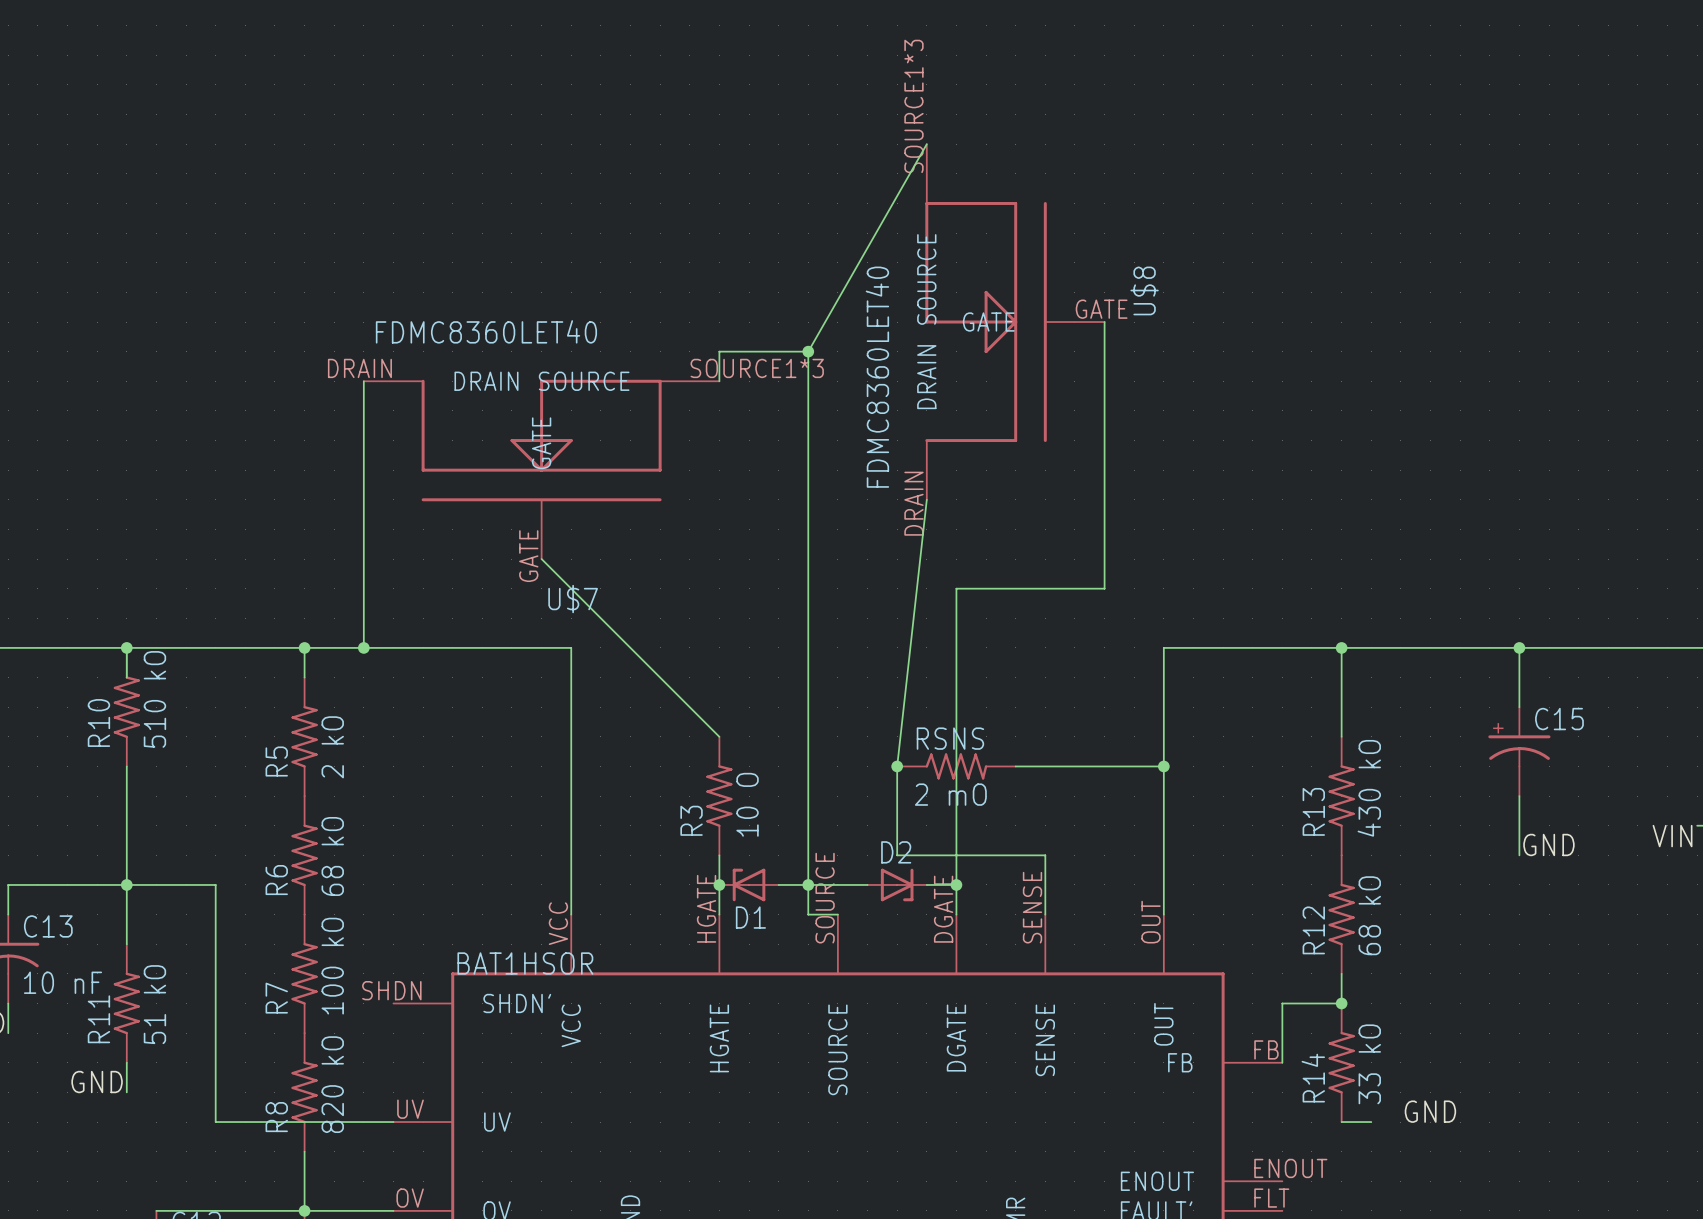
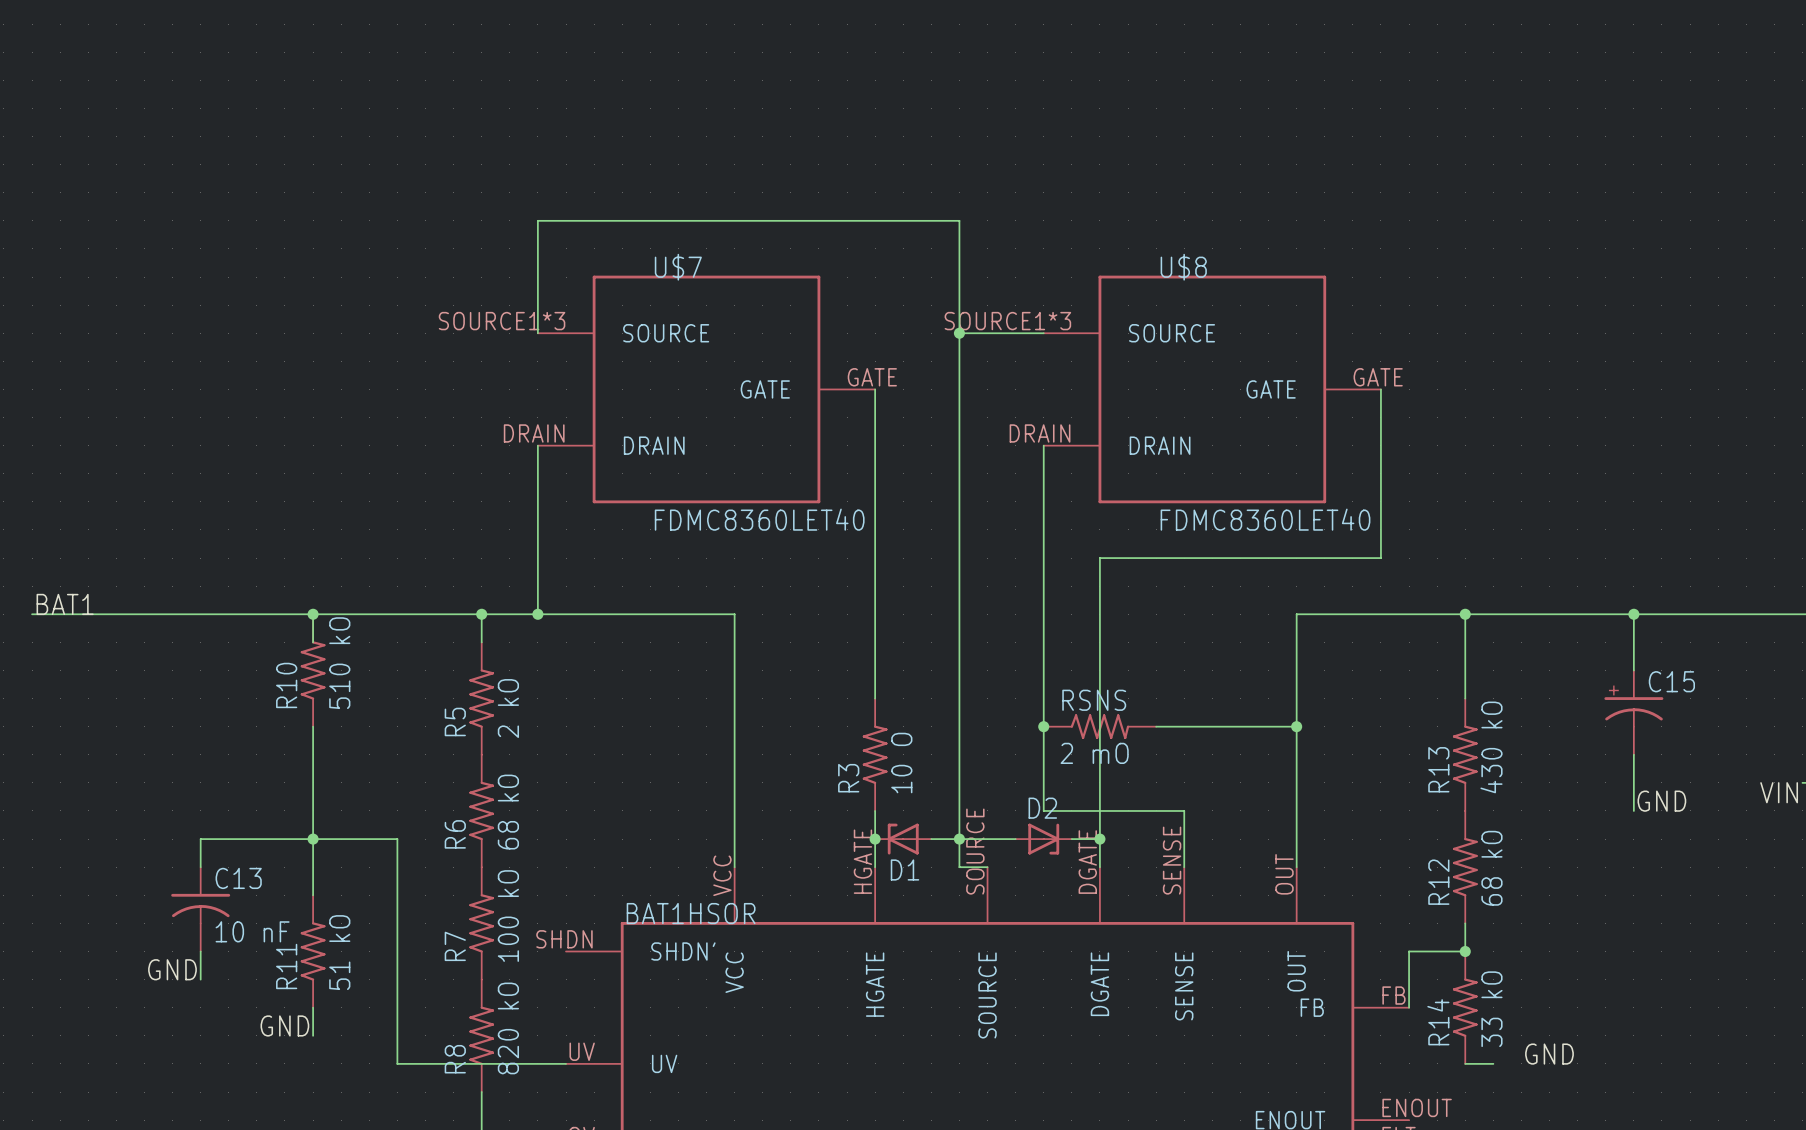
U$8 symbol: [925, 144, 1105, 500] -> [1043, 275, 1381, 504]
wire: (926, 144) (808, 351) (719, 351) (719, 381) -> none
U$8 name position: U$8 (1144, 290) -> U$8 (1183, 267)
wire: (1104, 322) (1104, 588) -> (1380, 389) (1380, 558) (1240, 558)
U$7 value position: FDMC8360LET40 (486, 331) -> FDMC8360LET40 (759, 519)
wire: none -> (537, 333) (537, 220) (959, 220) (959, 333) (1043, 333)
U$8 value position: FDMC8360LET40 (877, 377) -> FDMC8360LET40 (1265, 519)
U$7 symbol: [363, 379, 720, 560] -> [537, 275, 876, 504]
wire: (363, 381) (363, 470) -> none
wire: (926, 499) (897, 766) -> (1043, 445) (1043, 726)
wire: (541, 559) (719, 736) -> (875, 389) (875, 698)
U$7 name position: U$7 (573, 599) -> U$7 (678, 267)

